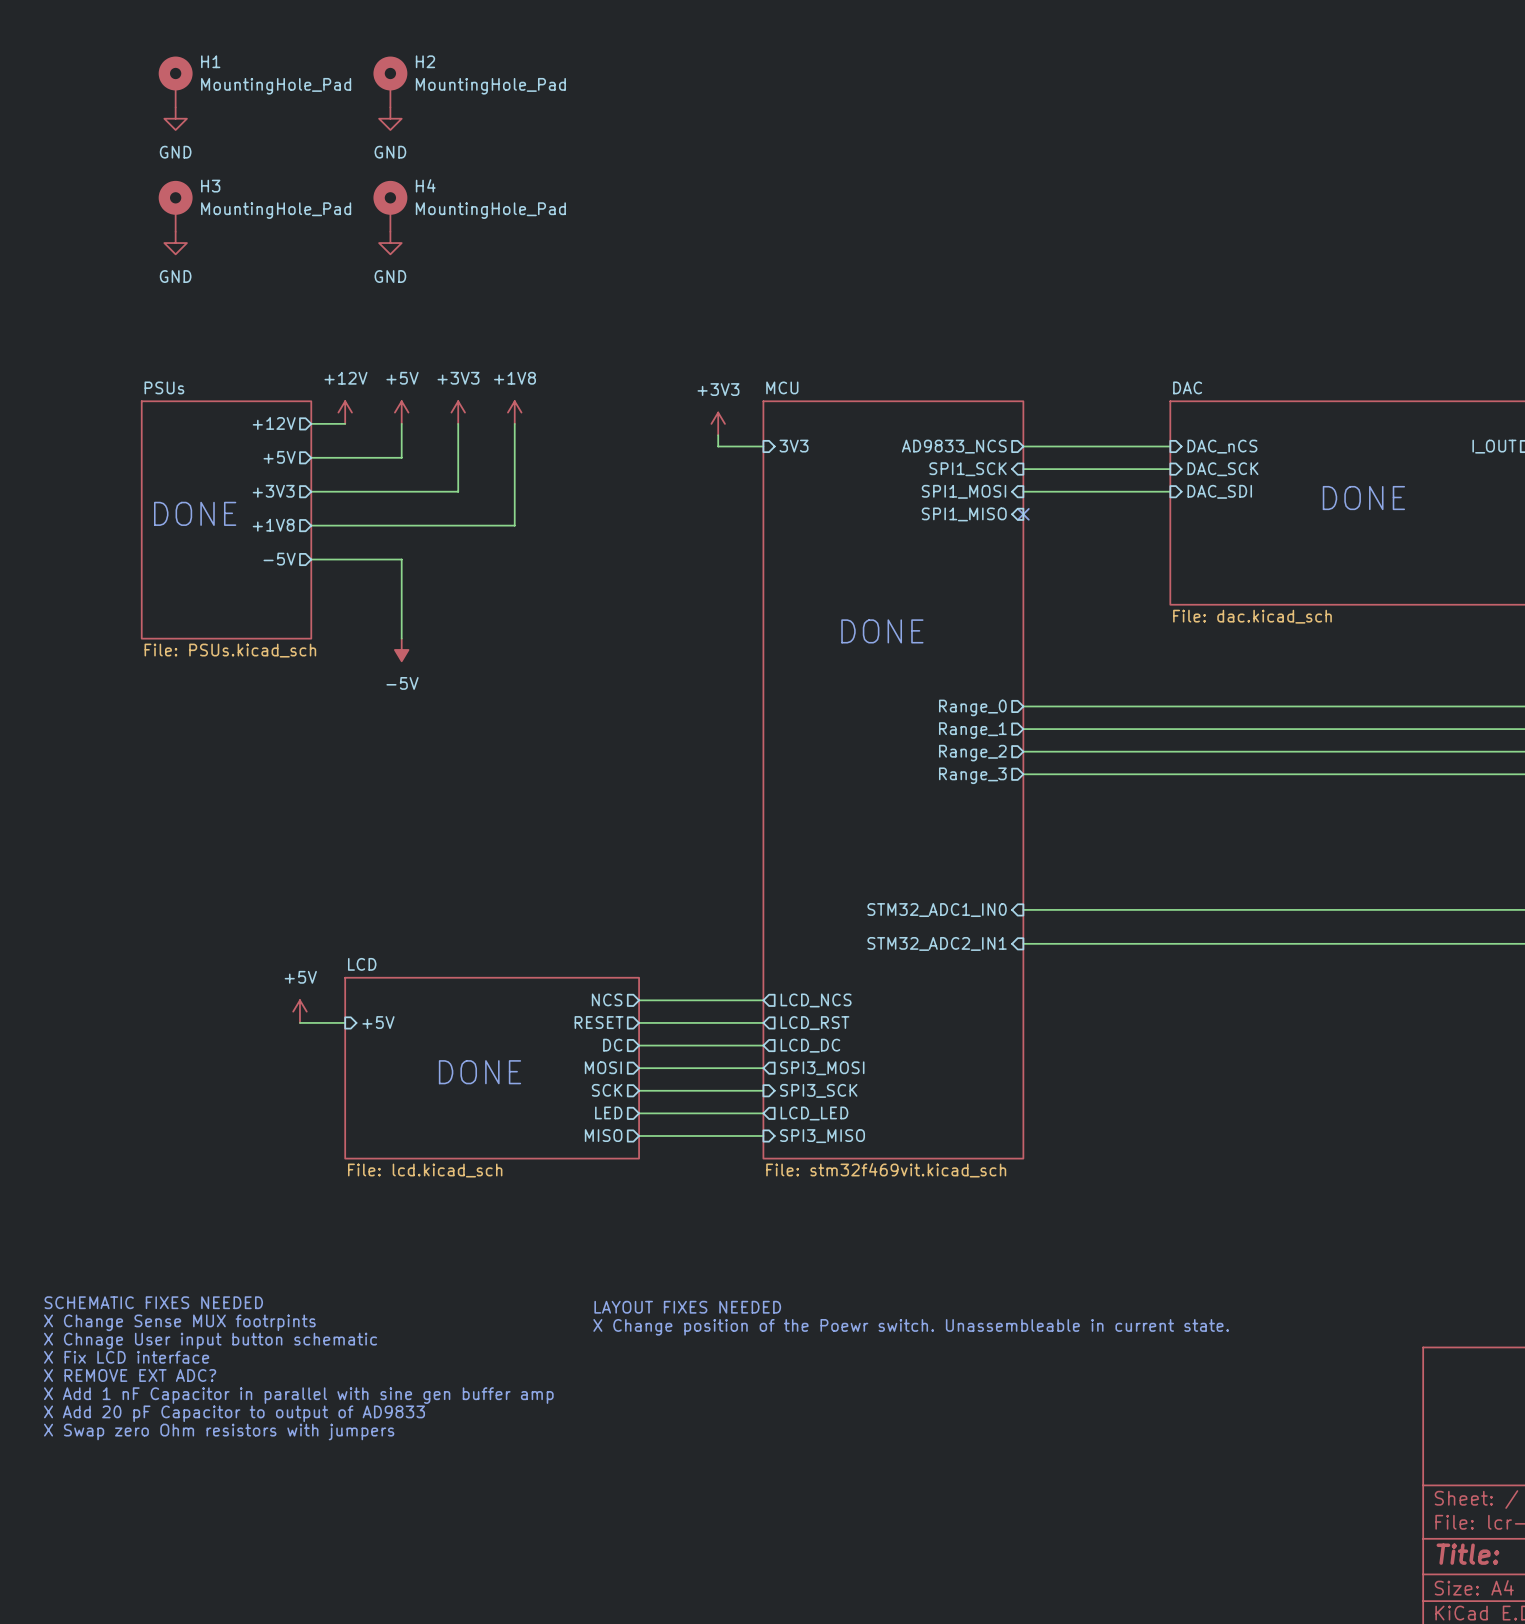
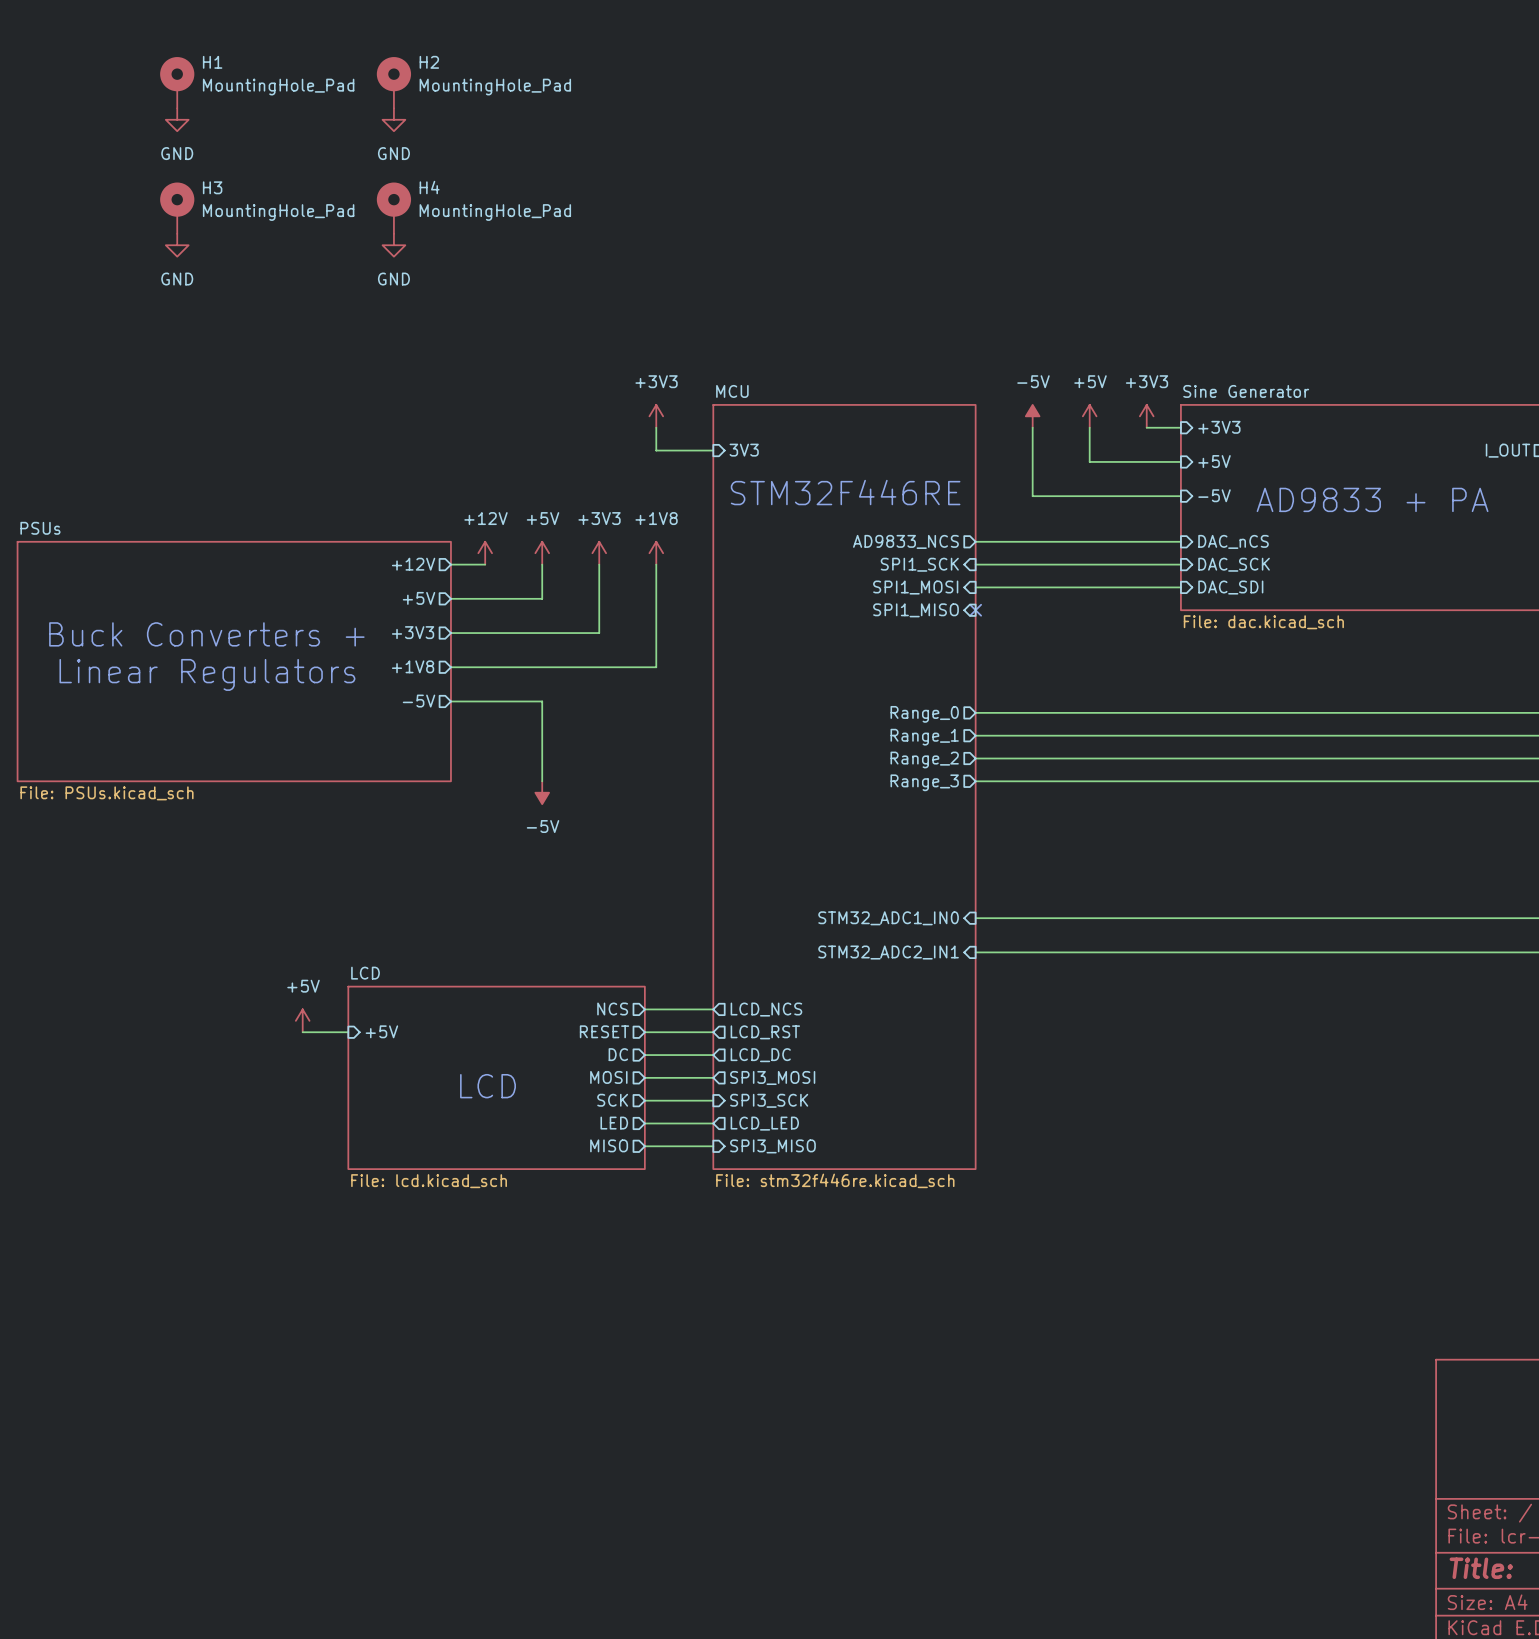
sheet DAC name: DAC (1187, 387) -> Sine Generator (1246, 391)
power symbol position: +12V (345, 412) -> +12V (485, 553)
power symbol position: +5V (401, 412) -> +5V (542, 553)
power symbol: +3V3 (458, 412) -> none
power symbol position: +1V8 (514, 412) -> +1V8 (656, 553)
power symbol: none -> -5V (1032, 416)
power symbol: none -> +5V (1089, 416)
power symbol: none -> +3V3 (1146, 416)
sheet pin position: +12V (274, 423) -> +12V (413, 564)
wire: (311, 423) (345, 423) -> (450, 564) (485, 564)
wire: (401, 423) (401, 457) (311, 457) -> (542, 564) (542, 598) (450, 598)
wire: (458, 423) (458, 491) (311, 491) -> (599, 564) (599, 633) (450, 633)
wire: (514, 423) (514, 525) (311, 525) -> (656, 564) (656, 667) (450, 667)
wire: none -> (656, 427) (656, 450) (713, 450)
power symbol position: +3V3 (718, 423) -> +3V3 (656, 416)
wire: none -> (1089, 427) (1089, 461) (1180, 461)
wire: none -> (1146, 427) (1180, 427)
sheet pin: none -> +3V3 (1219, 427)
wire: (718, 435) (718, 446) (763, 446) -> none
sheet pin position: 3V3 (793, 446) -> 3V3 (744, 450)
sheet pin position: AD9833_NCS (954, 446) -> AD9833_NCS (905, 541)
wire: (1023, 446) (1170, 446) -> none
sheet pin position: DAC_nCS (1222, 446) -> DAC_nCS (1233, 541)
sheet pin position: +5V (279, 457) -> +5V (419, 598)
sheet pin: none -> +5V (1214, 461)
sheet pin position: SPI1_SCK (968, 469) -> SPI1_SCK (919, 564)
wire: (1023, 469) (1170, 469) -> none
sheet pin position: DAC_SCK (1222, 469) -> DAC_SCK (1234, 564)
text: none -> STM32F446RE (845, 492)
sheet pin position: +3V3 (273, 491) -> +3V3 (413, 632)
sheet pin position: SPI1_MOSI (963, 491) -> SPI1_MOSI (915, 587)
sheet pin: DAC_SDI (1219, 491) -> -5V (1214, 495)
text: none -> AD9833 + PA (1372, 499)
text: DONE (1363, 498) -> none
text: DONE (195, 513) -> none
sheet pin position: SPI1_MISO (964, 514) -> SPI1_MISO (915, 610)
no-connect mark: (1023, 514) -> none
sheet PSUs: File: PSUs.kicad_sch (226, 519) -> none
sheet pin position: +1V8 (273, 525) -> +1V8 (413, 666)
wire: none -> (975, 541) (1180, 541)
power symbol: none -> +3V3 (599, 553)
sheet pin position: -5V (279, 559) -> -5V (419, 701)
wire: (311, 559) (401, 559) (401, 638) -> (450, 701) (542, 701) (542, 781)
wire: none -> (975, 564) (1180, 564)
wire: none -> (975, 587) (1180, 587)
sheet pin: none -> DAC_SDI (1230, 587)
no-connect mark: none -> (975, 610)
text: none -> Buck Converters + (206, 634)
text: DONE (882, 631) -> none
power symbol position: -5V (401, 649) -> -5V (542, 792)
sheet PSUs: none -> File: PSUs.kicad_sch (234, 661)
text: none -> Linear Regulators (207, 674)
wire: none -> (975, 712) (1032, 712)
sheet pin position: Range_0 (972, 707) -> Range_0 (924, 714)
wire: none -> (975, 735) (1032, 735)
sheet pin position: Range_1 (972, 730) -> Range_1 (924, 737)
wire: none -> (975, 758) (1032, 758)
sheet pin position: Range_2 (972, 753) -> Range_2 (924, 759)
wire: none -> (975, 781) (1032, 781)
sheet pin position: Range_3 (972, 775) -> Range_3 (924, 782)
sheet MCU: none -> File: stm32f446re.kicad_sch (844, 787)
sheet MCU: File: stm32f469vit.kicad_sch (893, 779) -> none
wire: none -> (975, 918) (1032, 918)
sheet pin position: STM32_ADC1_IN0 (937, 910) -> STM32_ADC1_IN0 (888, 918)
sheet pin position: STM32_ADC2_IN1 (937, 943) -> STM32_ADC2_IN1 (888, 952)
wire: none -> (975, 952) (1032, 952)
wire: (706, 1000) (763, 1000) -> none
sheet pin position: LCD_NCS (816, 1000) -> LCD_NCS (766, 1009)
wire: (706, 1022) (763, 1022) -> none
sheet pin position: LCD_RST (814, 1023) -> LCD_RST (765, 1032)
wire: (706, 1045) (763, 1045) -> none
sheet pin position: LCD_DC (810, 1045) -> LCD_DC (760, 1055)
wire: (706, 1068) (763, 1068) -> none
sheet pin position: SPI3_MOSI (822, 1068) -> SPI3_MOSI (772, 1077)
text: DONE (479, 1072) -> none
text: none -> LCD (488, 1086)
wire: (706, 1090) (763, 1090) -> none
sheet pin position: SPI3_SCK (818, 1090) -> SPI3_SCK (769, 1100)
wire: (706, 1113) (763, 1113) -> none
sheet pin position: LCD_LED (814, 1113) -> LCD_LED (764, 1123)
wire: (706, 1135) (763, 1135) -> none
sheet pin position: SPI3_MISO (822, 1136) -> SPI3_MISO (772, 1146)
text: SCHEMATIC FIXES NEEDED (153, 1302) -> none
text: LAYOUT FIXES NEEDED (687, 1307) -> none
text: X Change Sense MUX footrpints (179, 1322) -> none
text: X Change position of the Poewr switch. Unassembleable in current state. (911, 1327) -> none
text: X Chnage User input button schematic (210, 1341) -> none
text: X Fix LCD interface (126, 1357) -> none
text: X REMOVE EXT ADC? (130, 1375) -> none
text: X Add 1 nF Capacitor in parallel with sine gen buffer amp (298, 1395) -> none
text: X Add 20 pF Capacitor to output of AD9833 (234, 1413) -> none
text: X Swap zero Ohm resistors with jumpers (219, 1431) -> none

